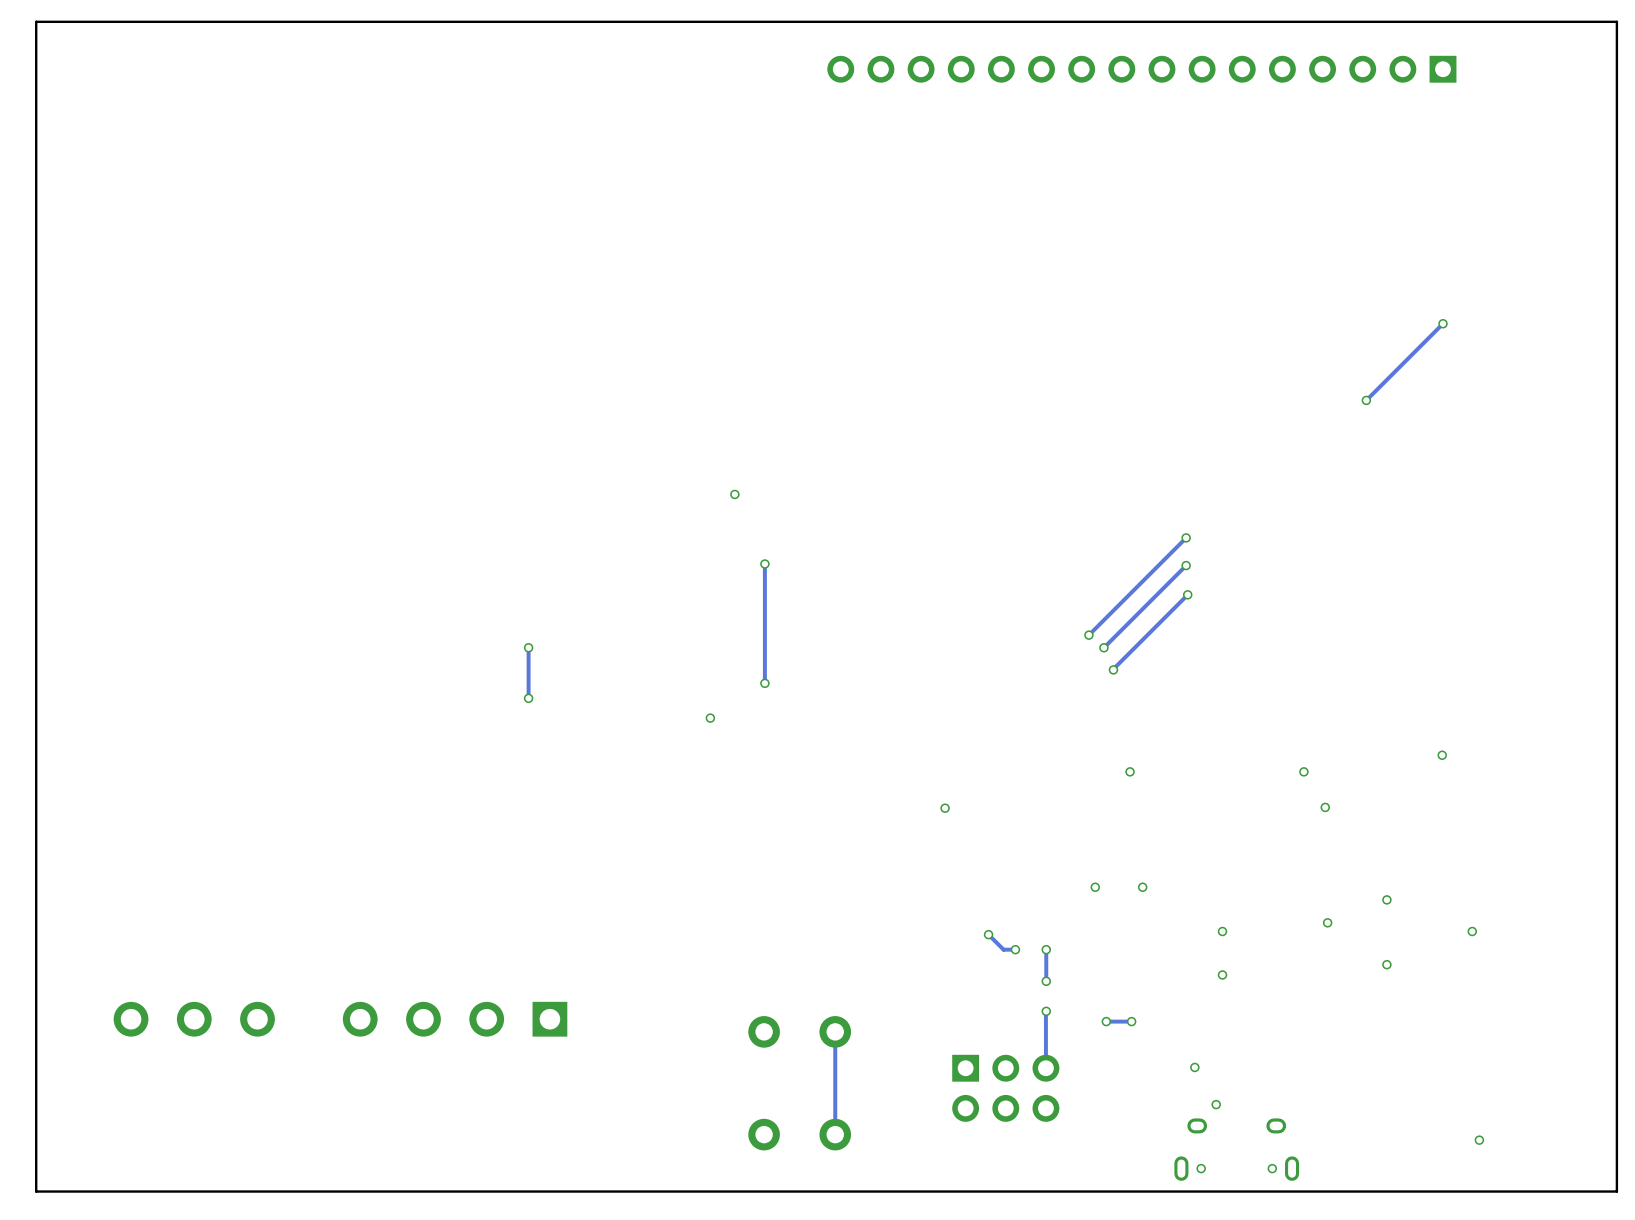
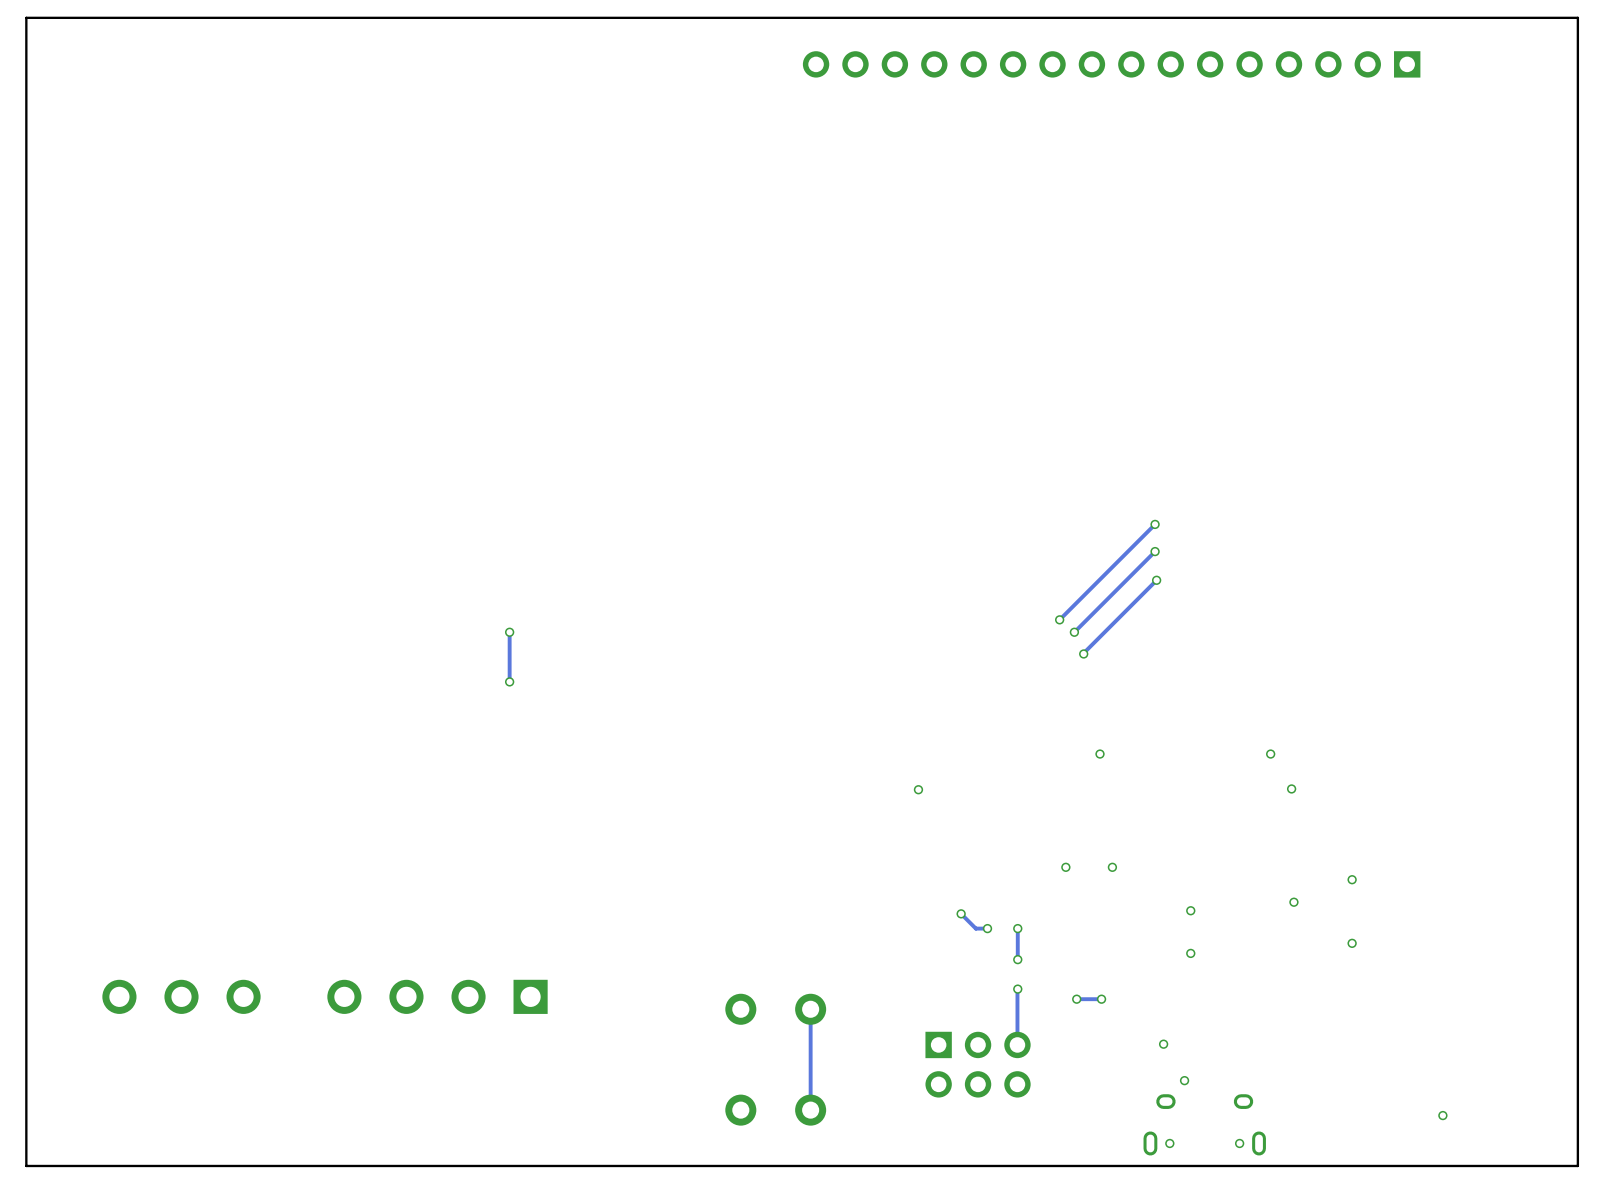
track: (1443, 323) (1366, 400) -> none
via: (1443, 323) -> none
via: (1366, 400) -> none
via: (734, 494) -> none
track: (764, 564) (764, 683) -> none
via: (764, 564) -> none
via: (764, 683) -> none
via: (710, 718) -> none
via: (1442, 755) -> none
via: (1472, 931) -> none

